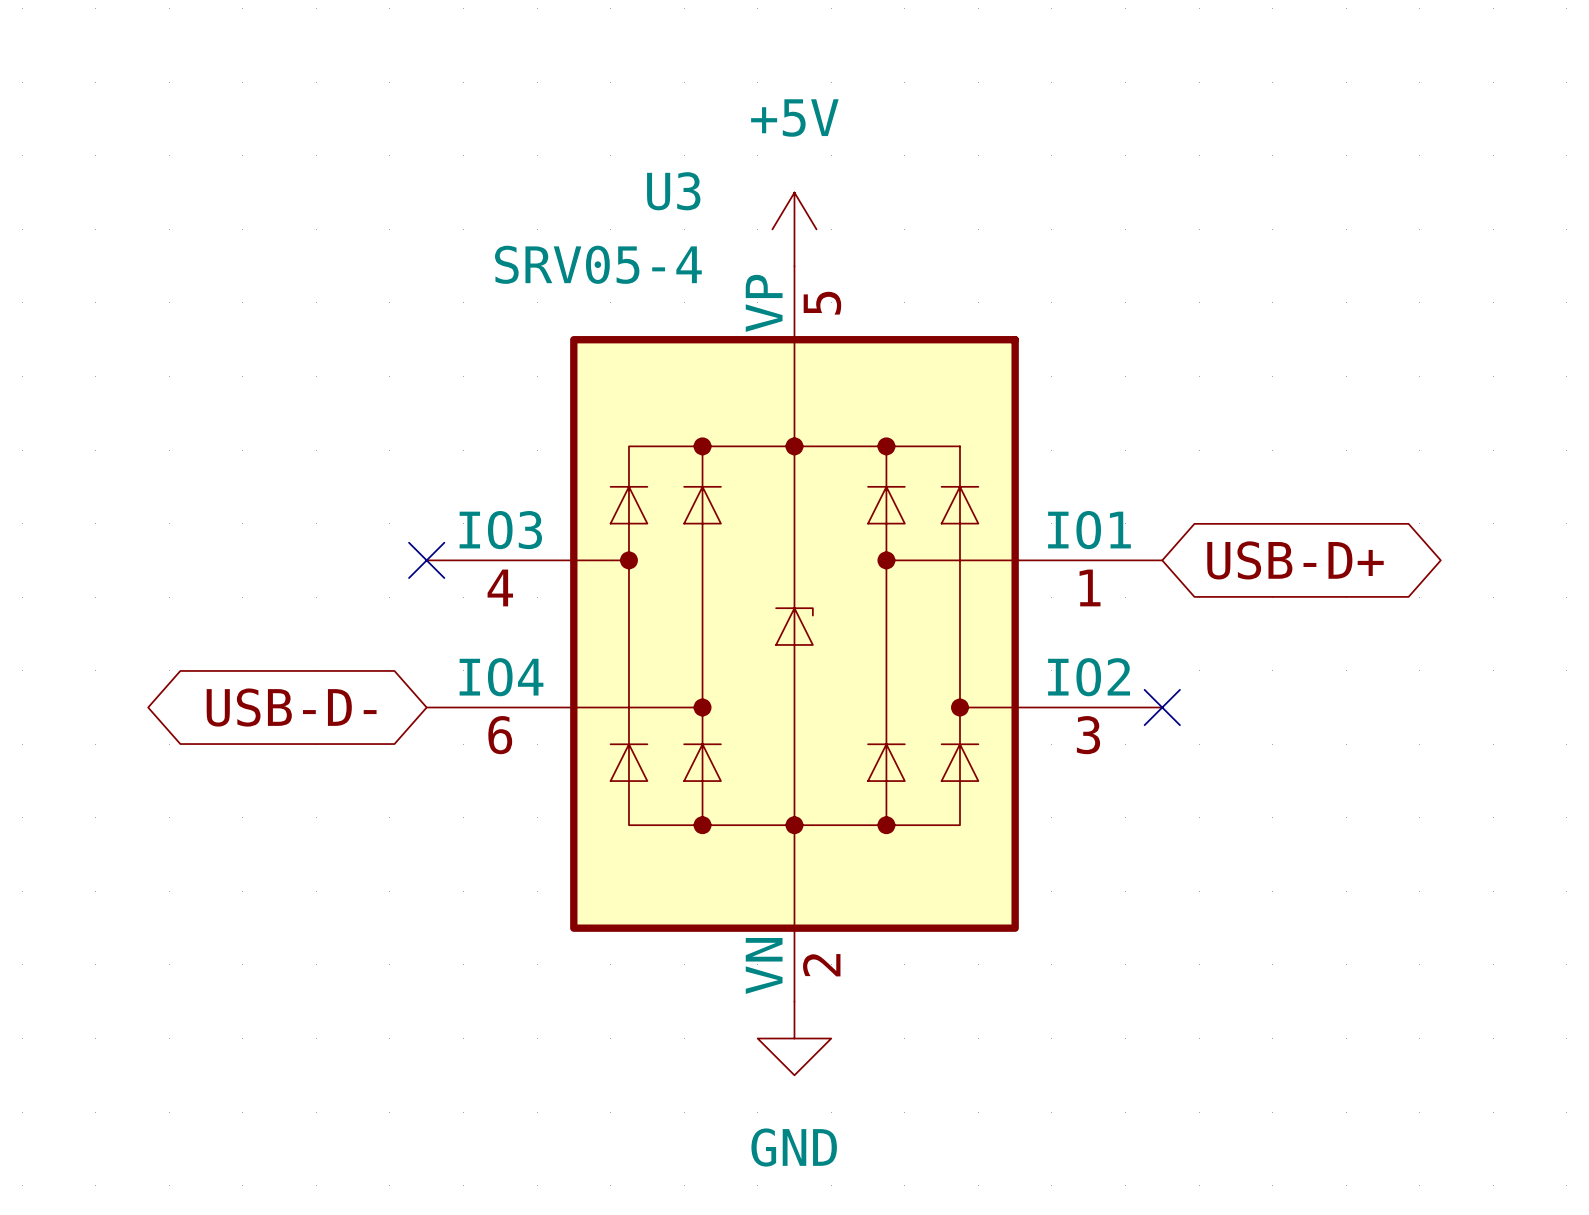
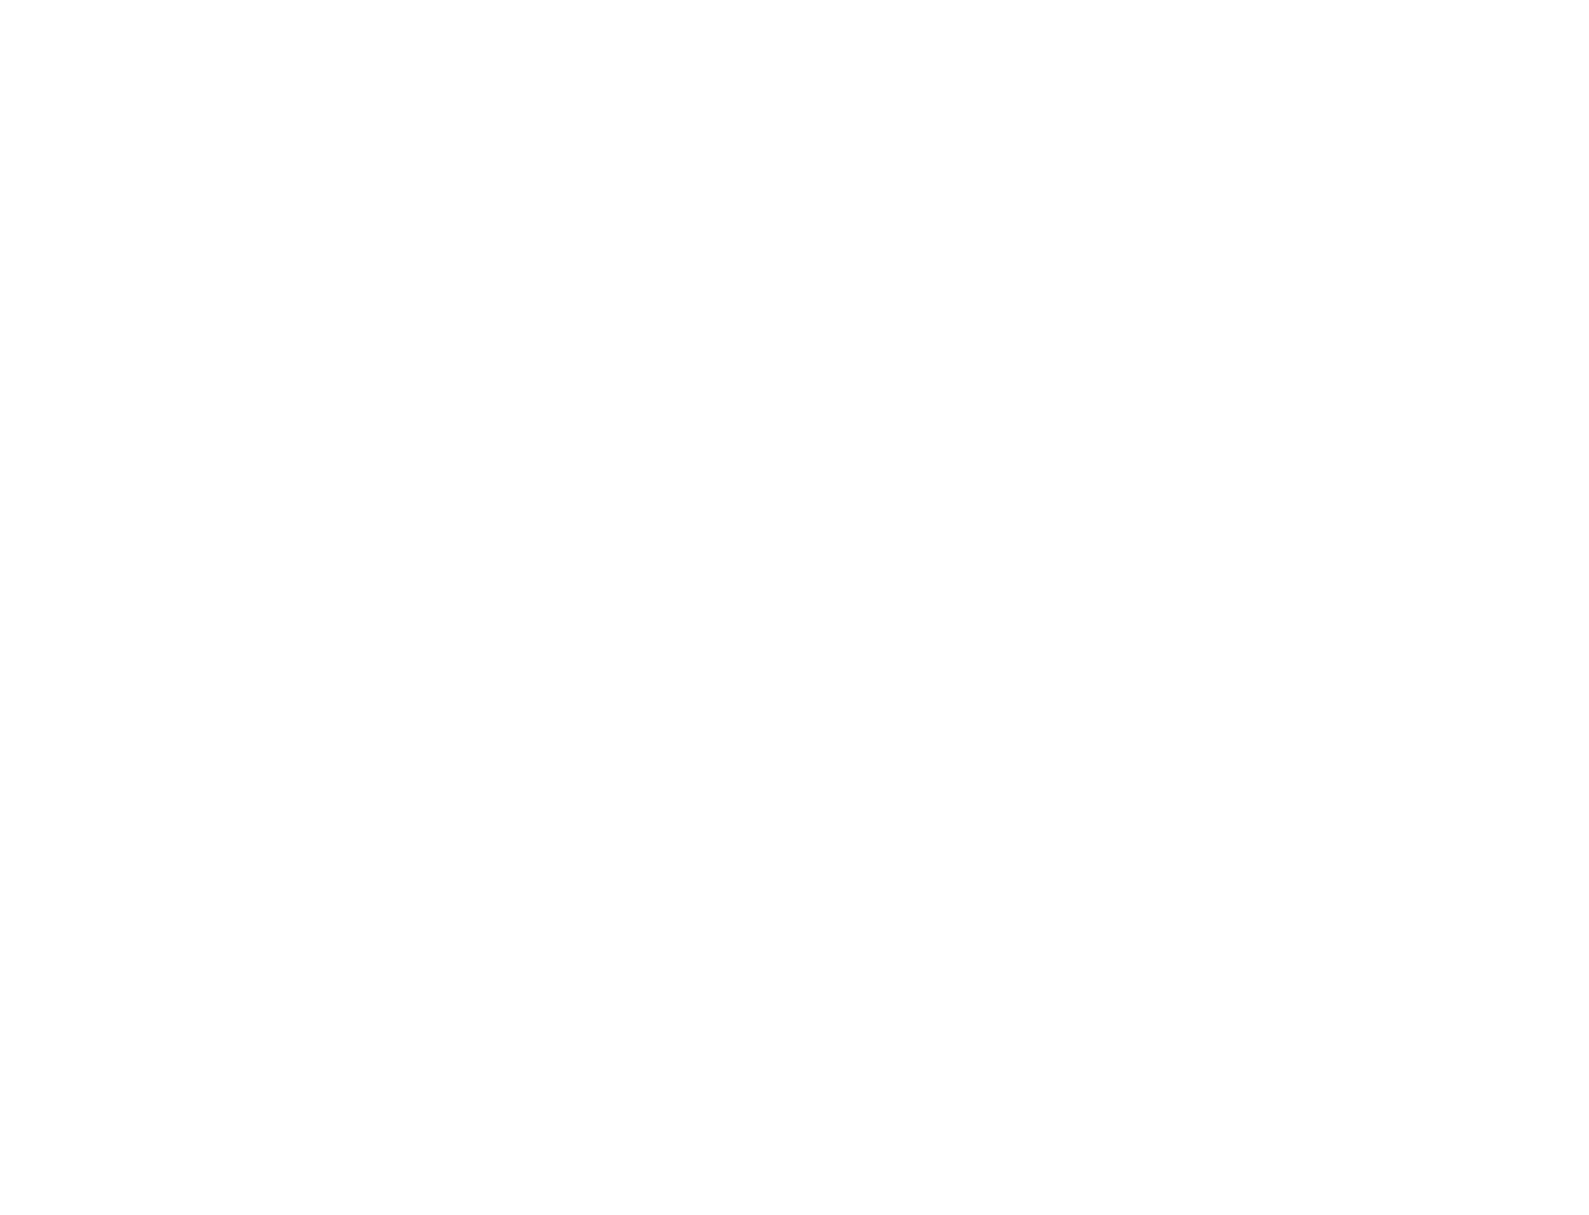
power symbol: +5V (794, 229) -> none
no-connect mark: (426, 560) -> none
global label: USB-D+ (1295, 560) -> none
U3: SRV05-4 (794, 633) -> none
global label: USB-D- (291, 707) -> none
no-connect mark: (1162, 707) -> none
power symbol: GND (794, 1038) -> none

